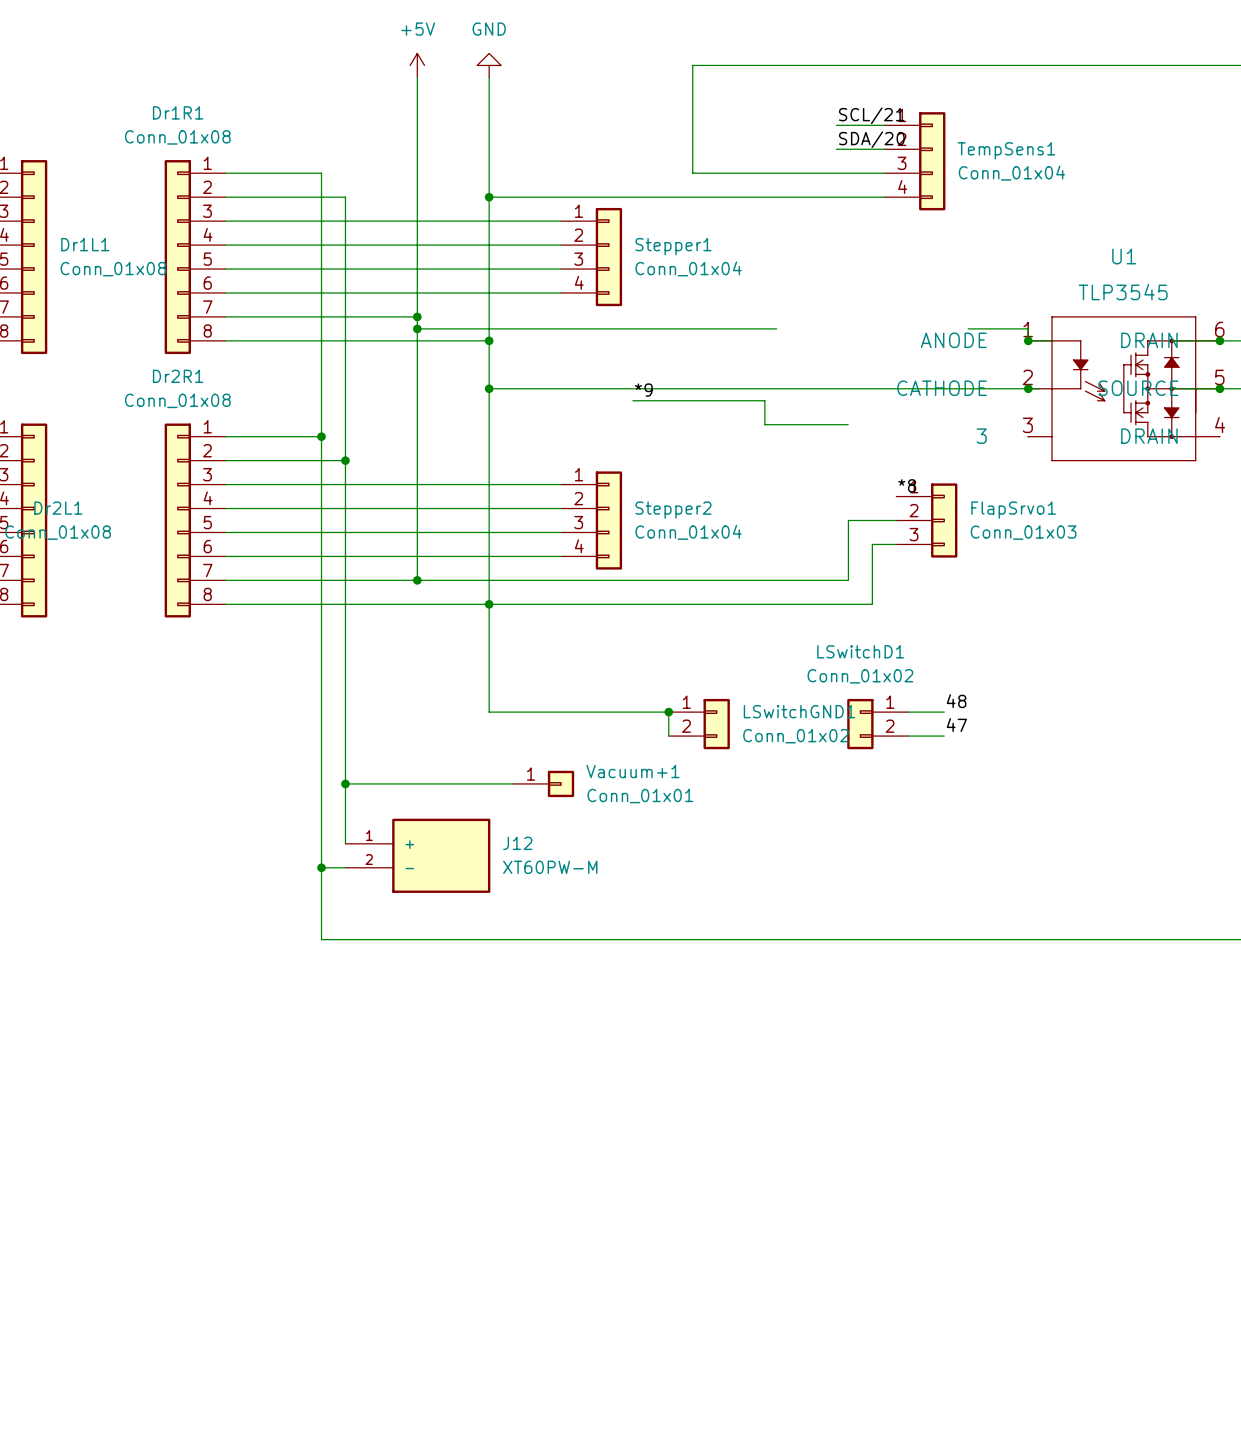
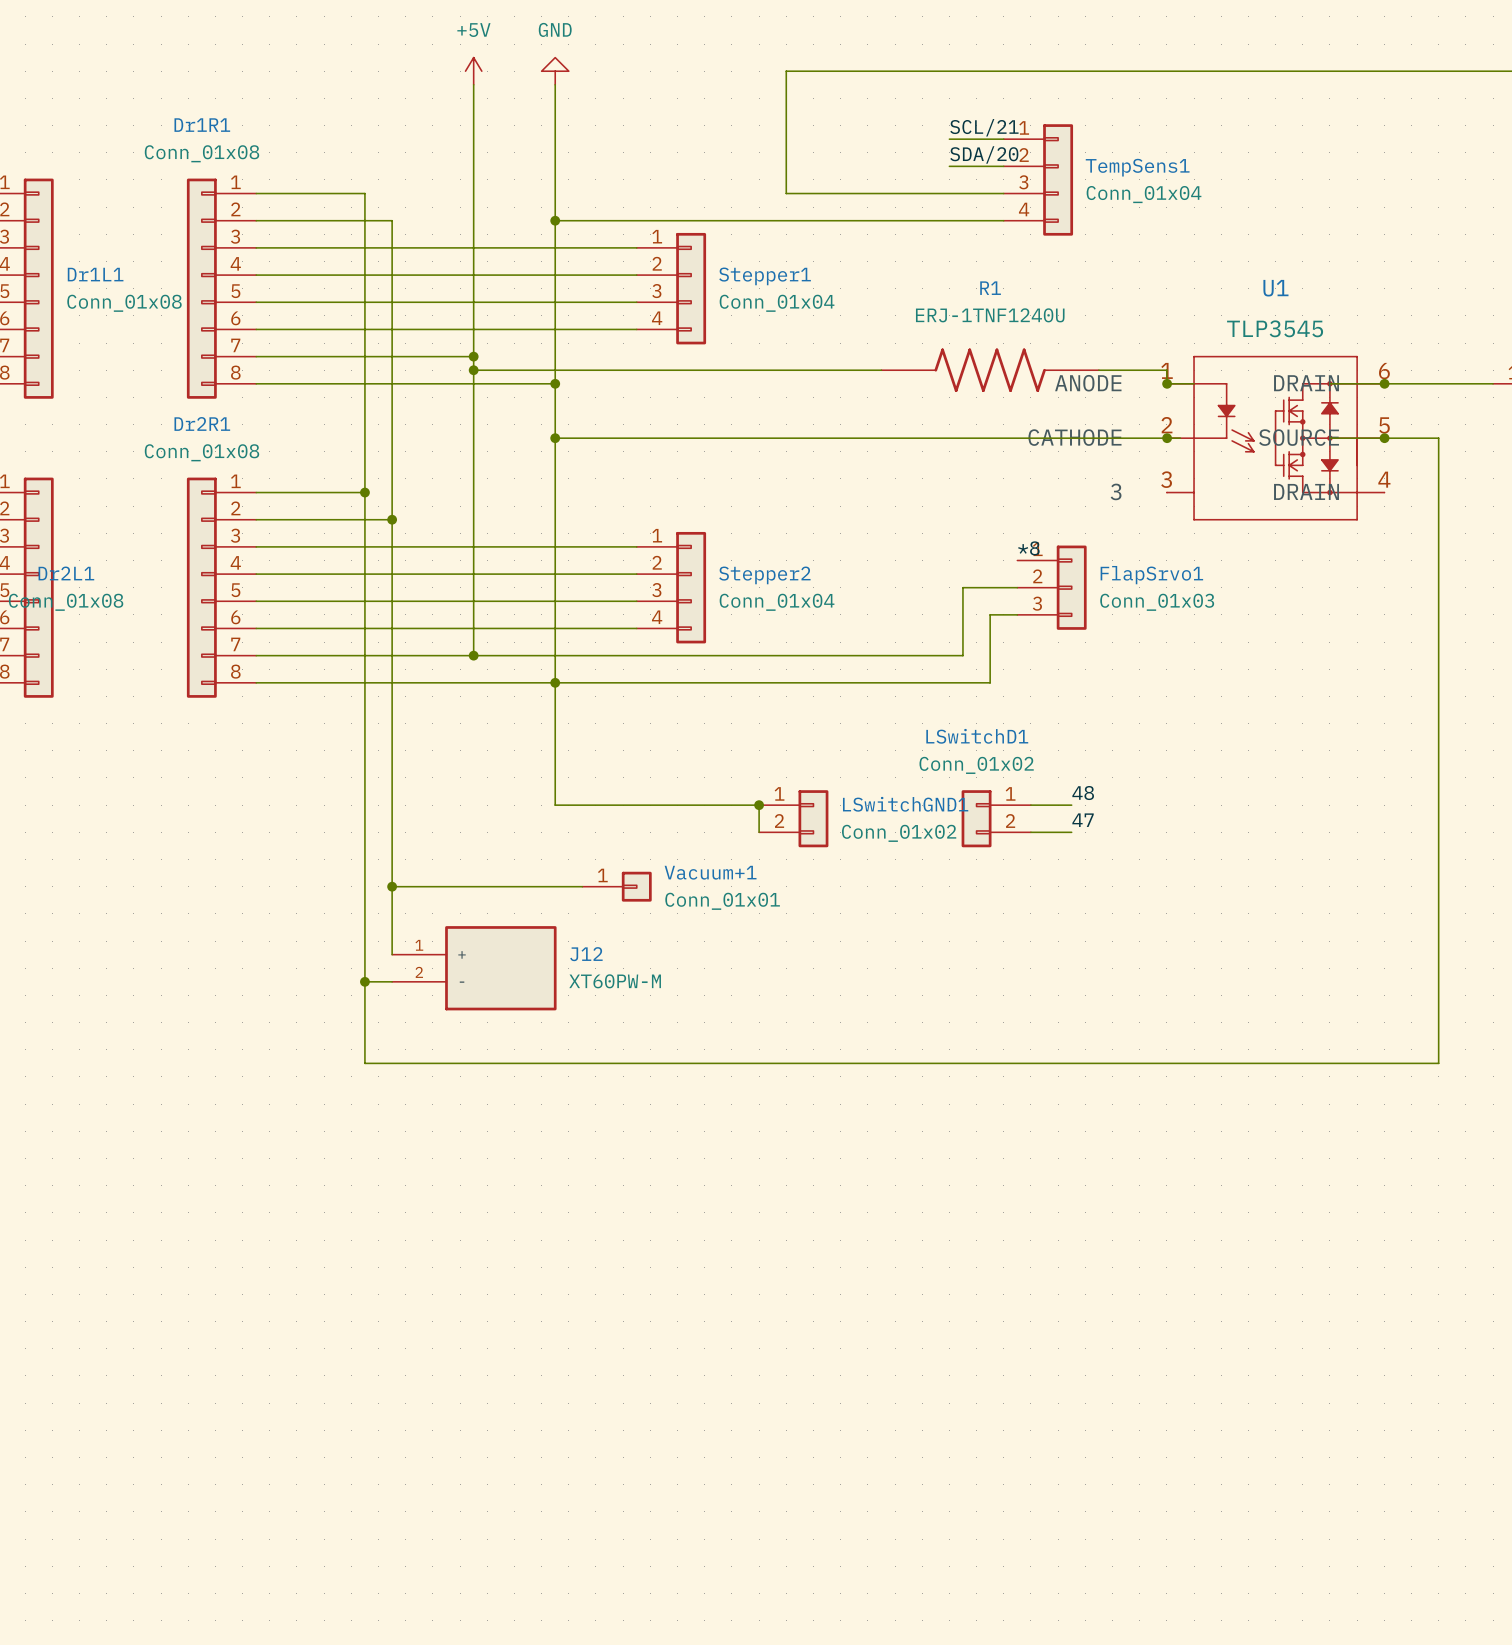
R1: none -> ERJ-1TNF1240U (990, 370)
label: *9 (643, 390) -> none
wire: (632, 400) (764, 400) (764, 424) (848, 424) -> none

